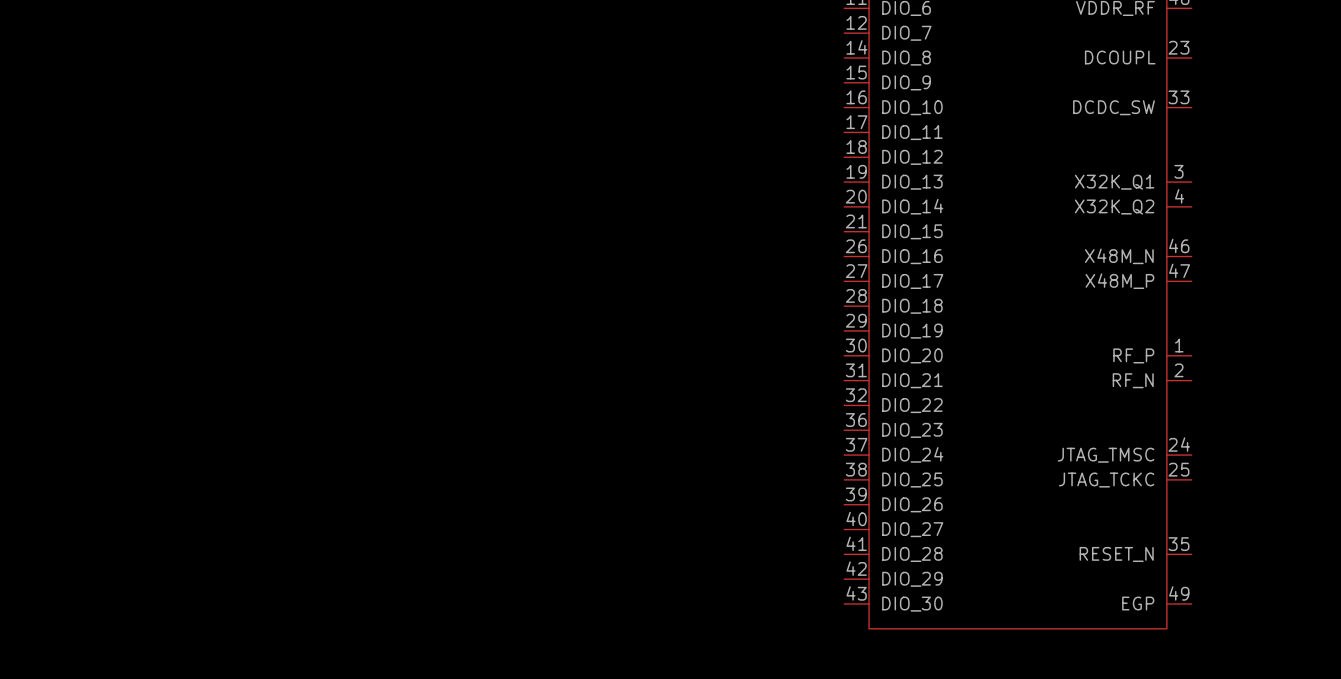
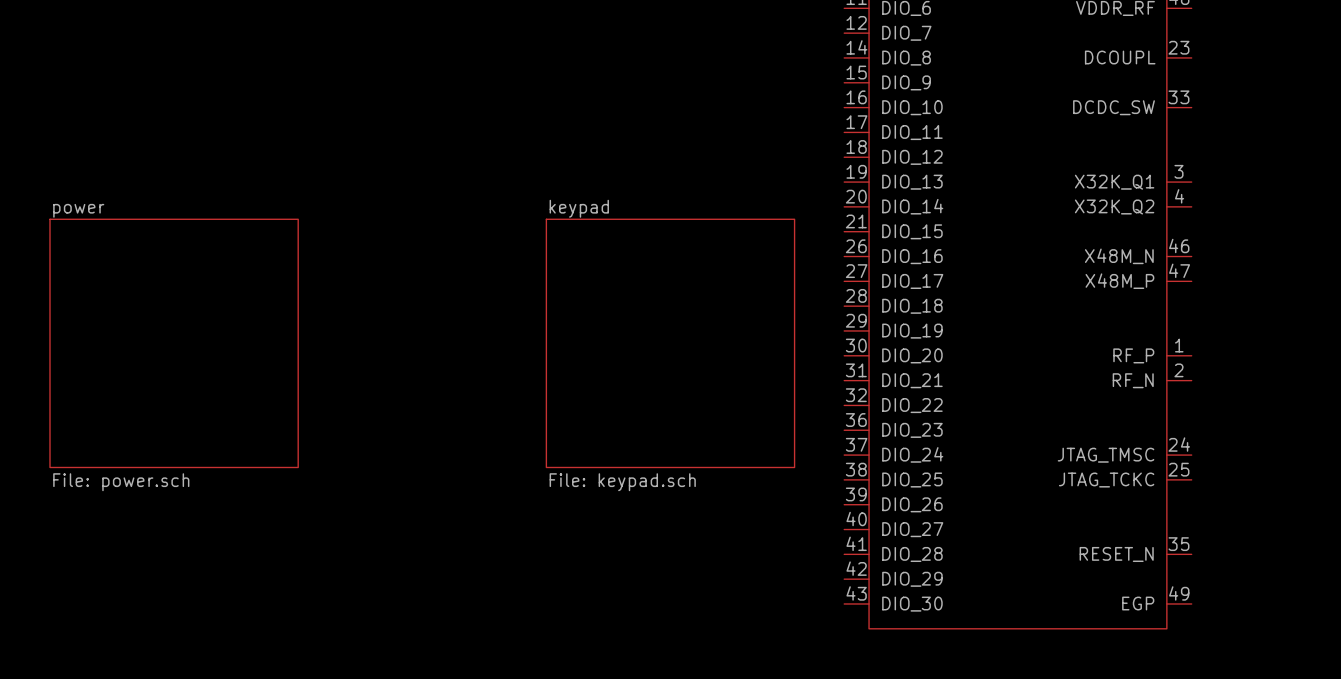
sheet power: none -> File: power.sch (174, 343)
sheet keypad: none -> File: keypad.sch (670, 343)

